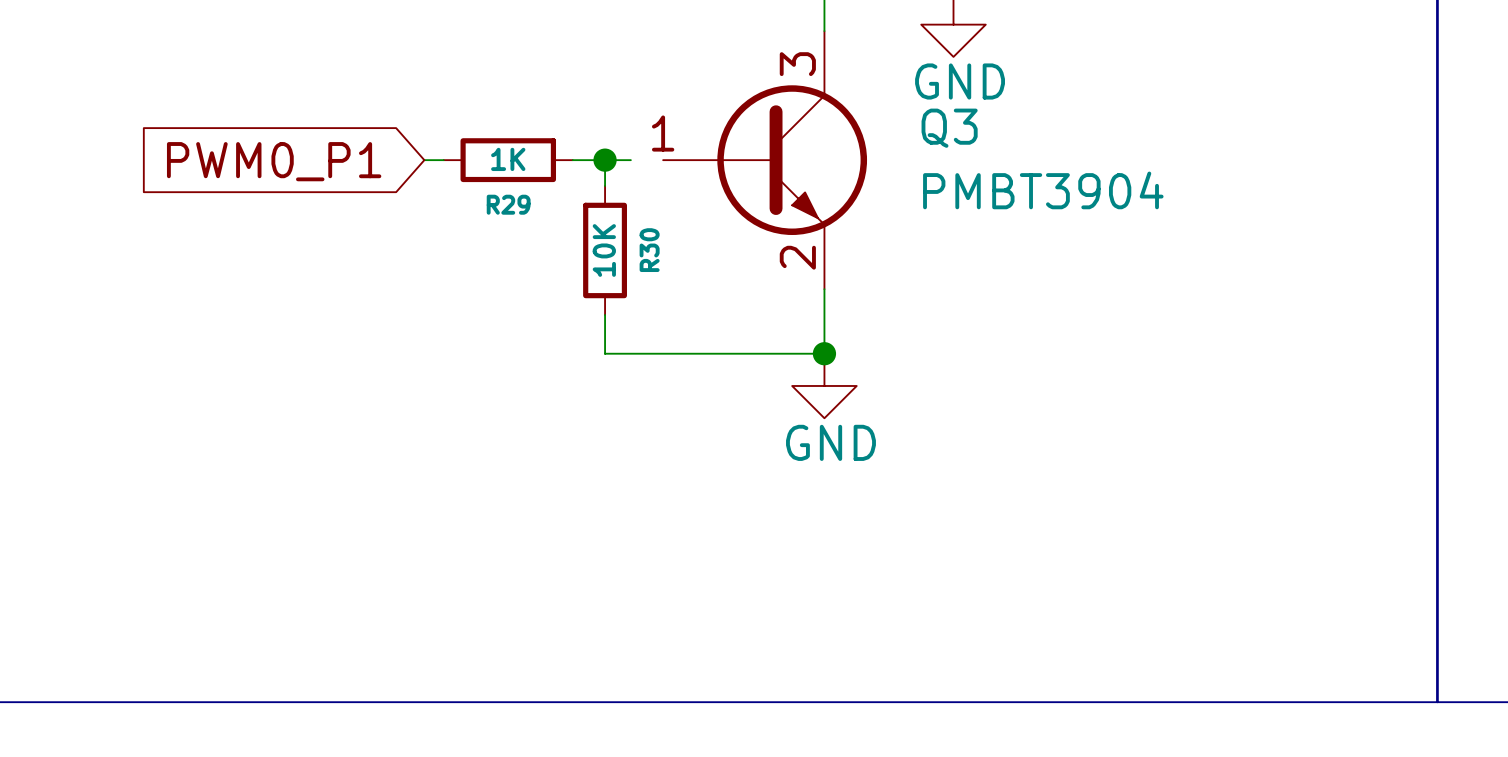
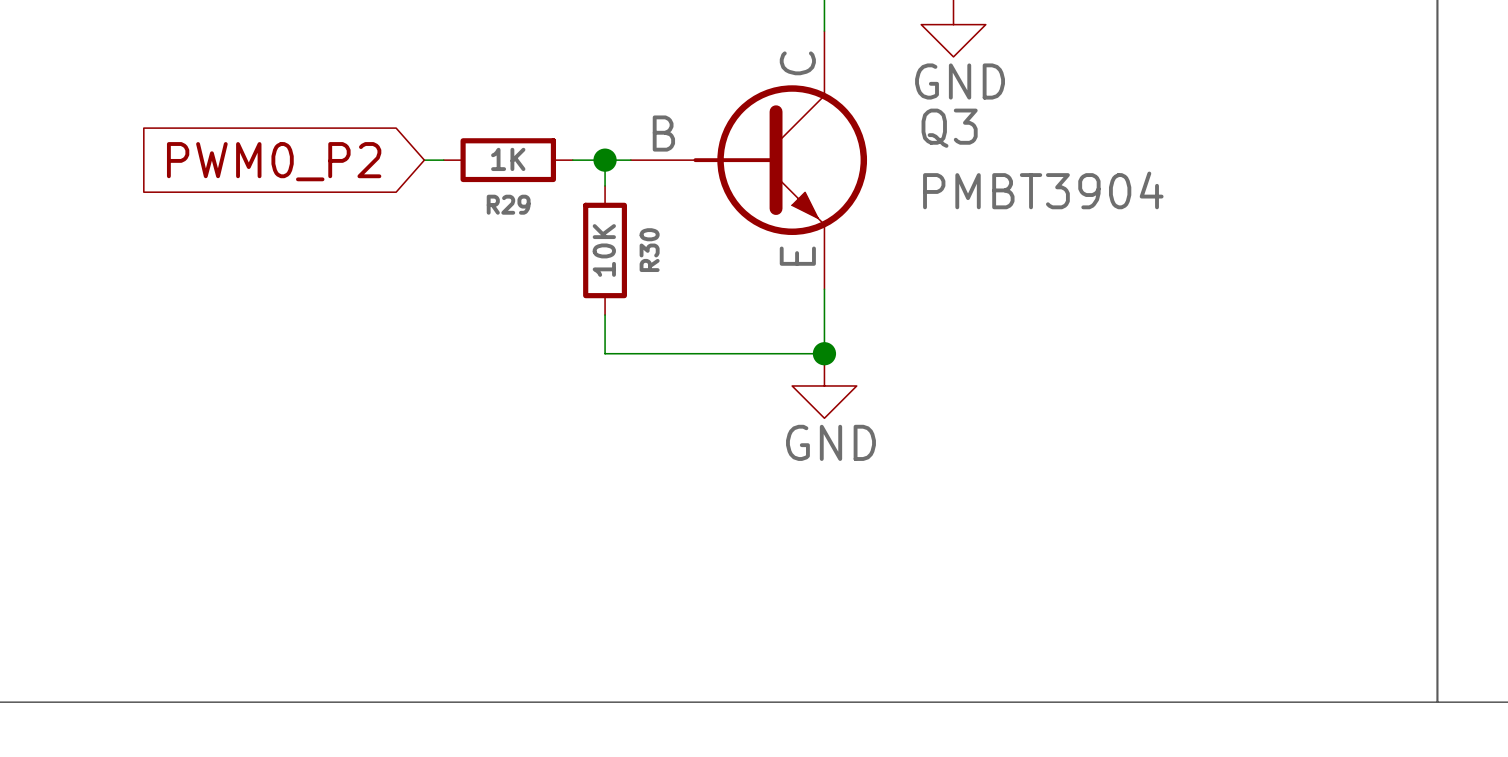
Q3 symbol: [663, 31, 868, 290] -> [630, 31, 868, 290]
global label: PWM0_P1 (274, 161) -> PWM0_P2 (274, 161)

